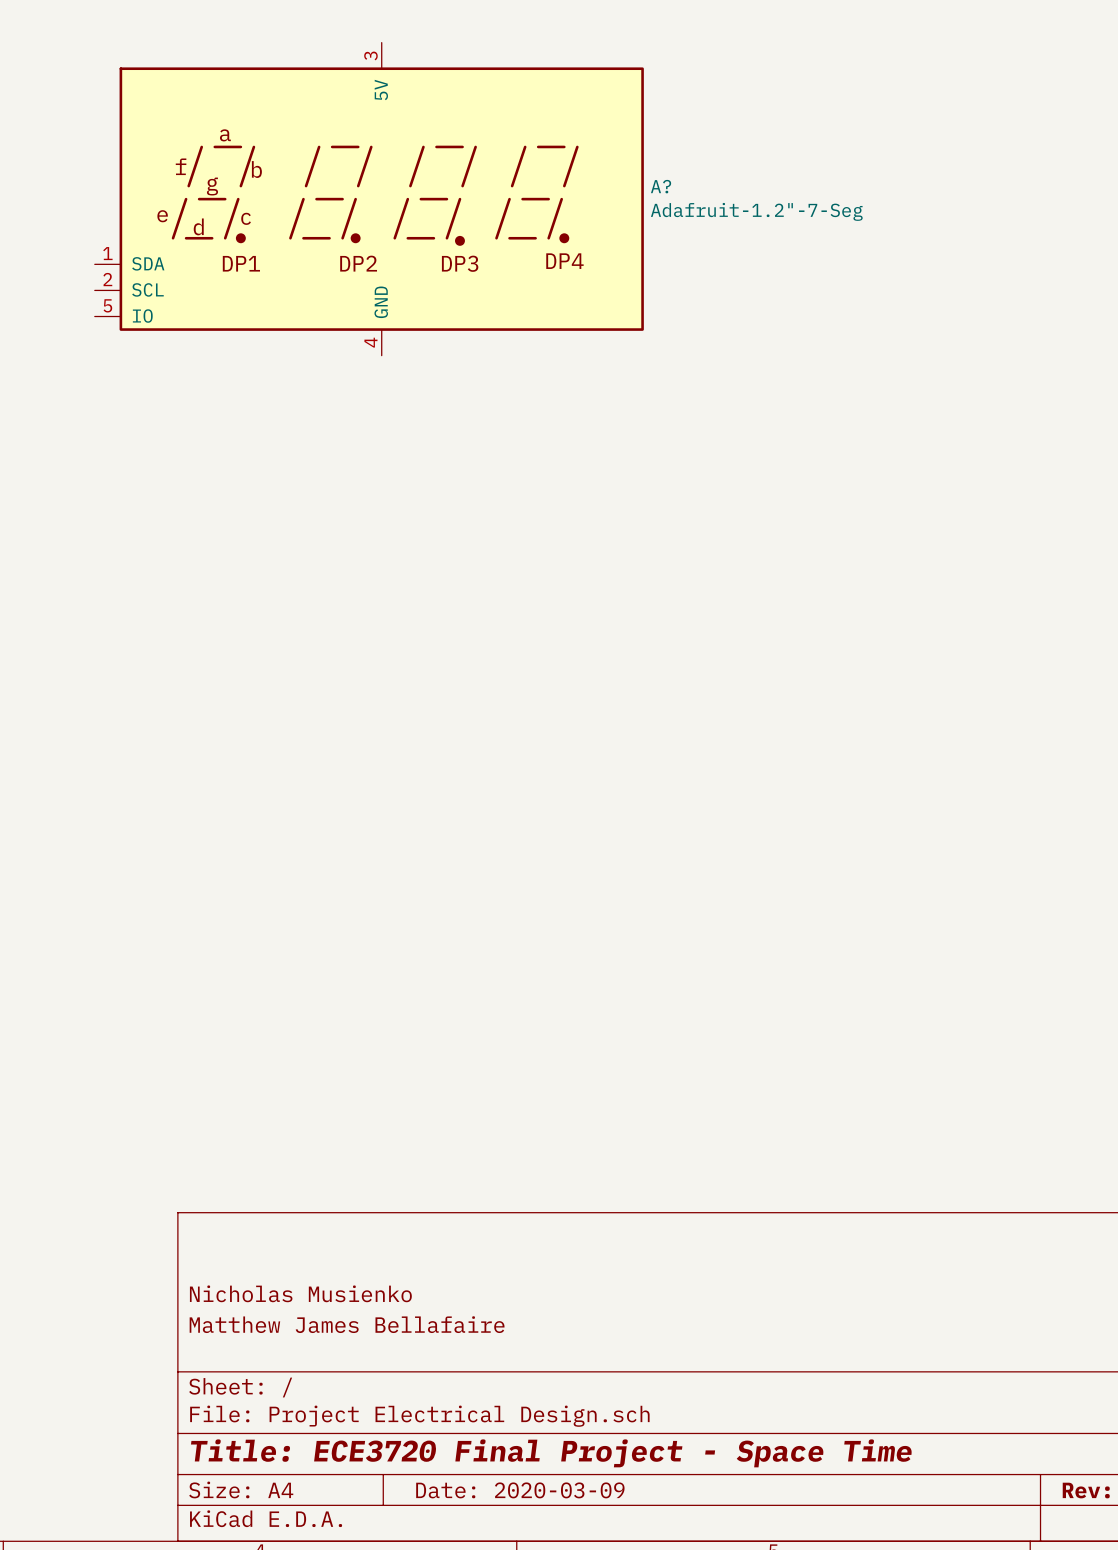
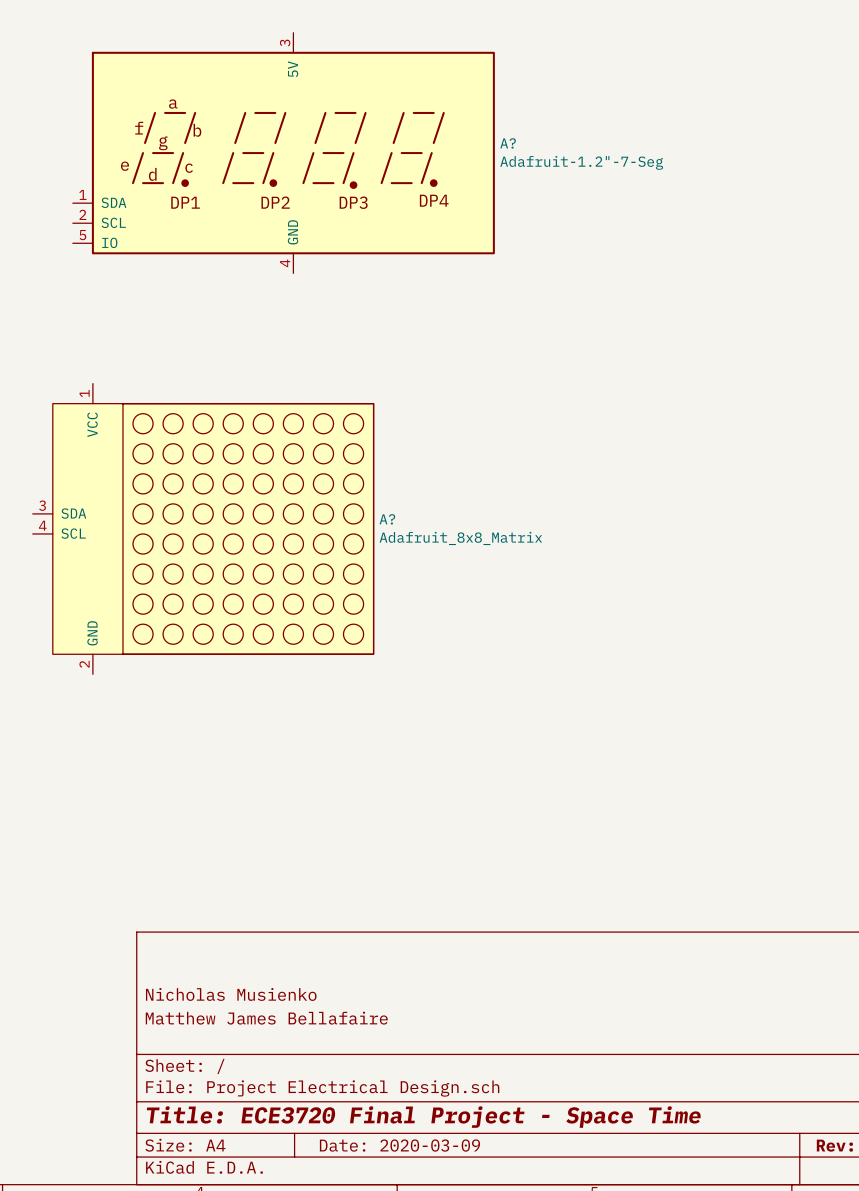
A?: none -> Adafruit_8x8_Matrix (203, 528)

